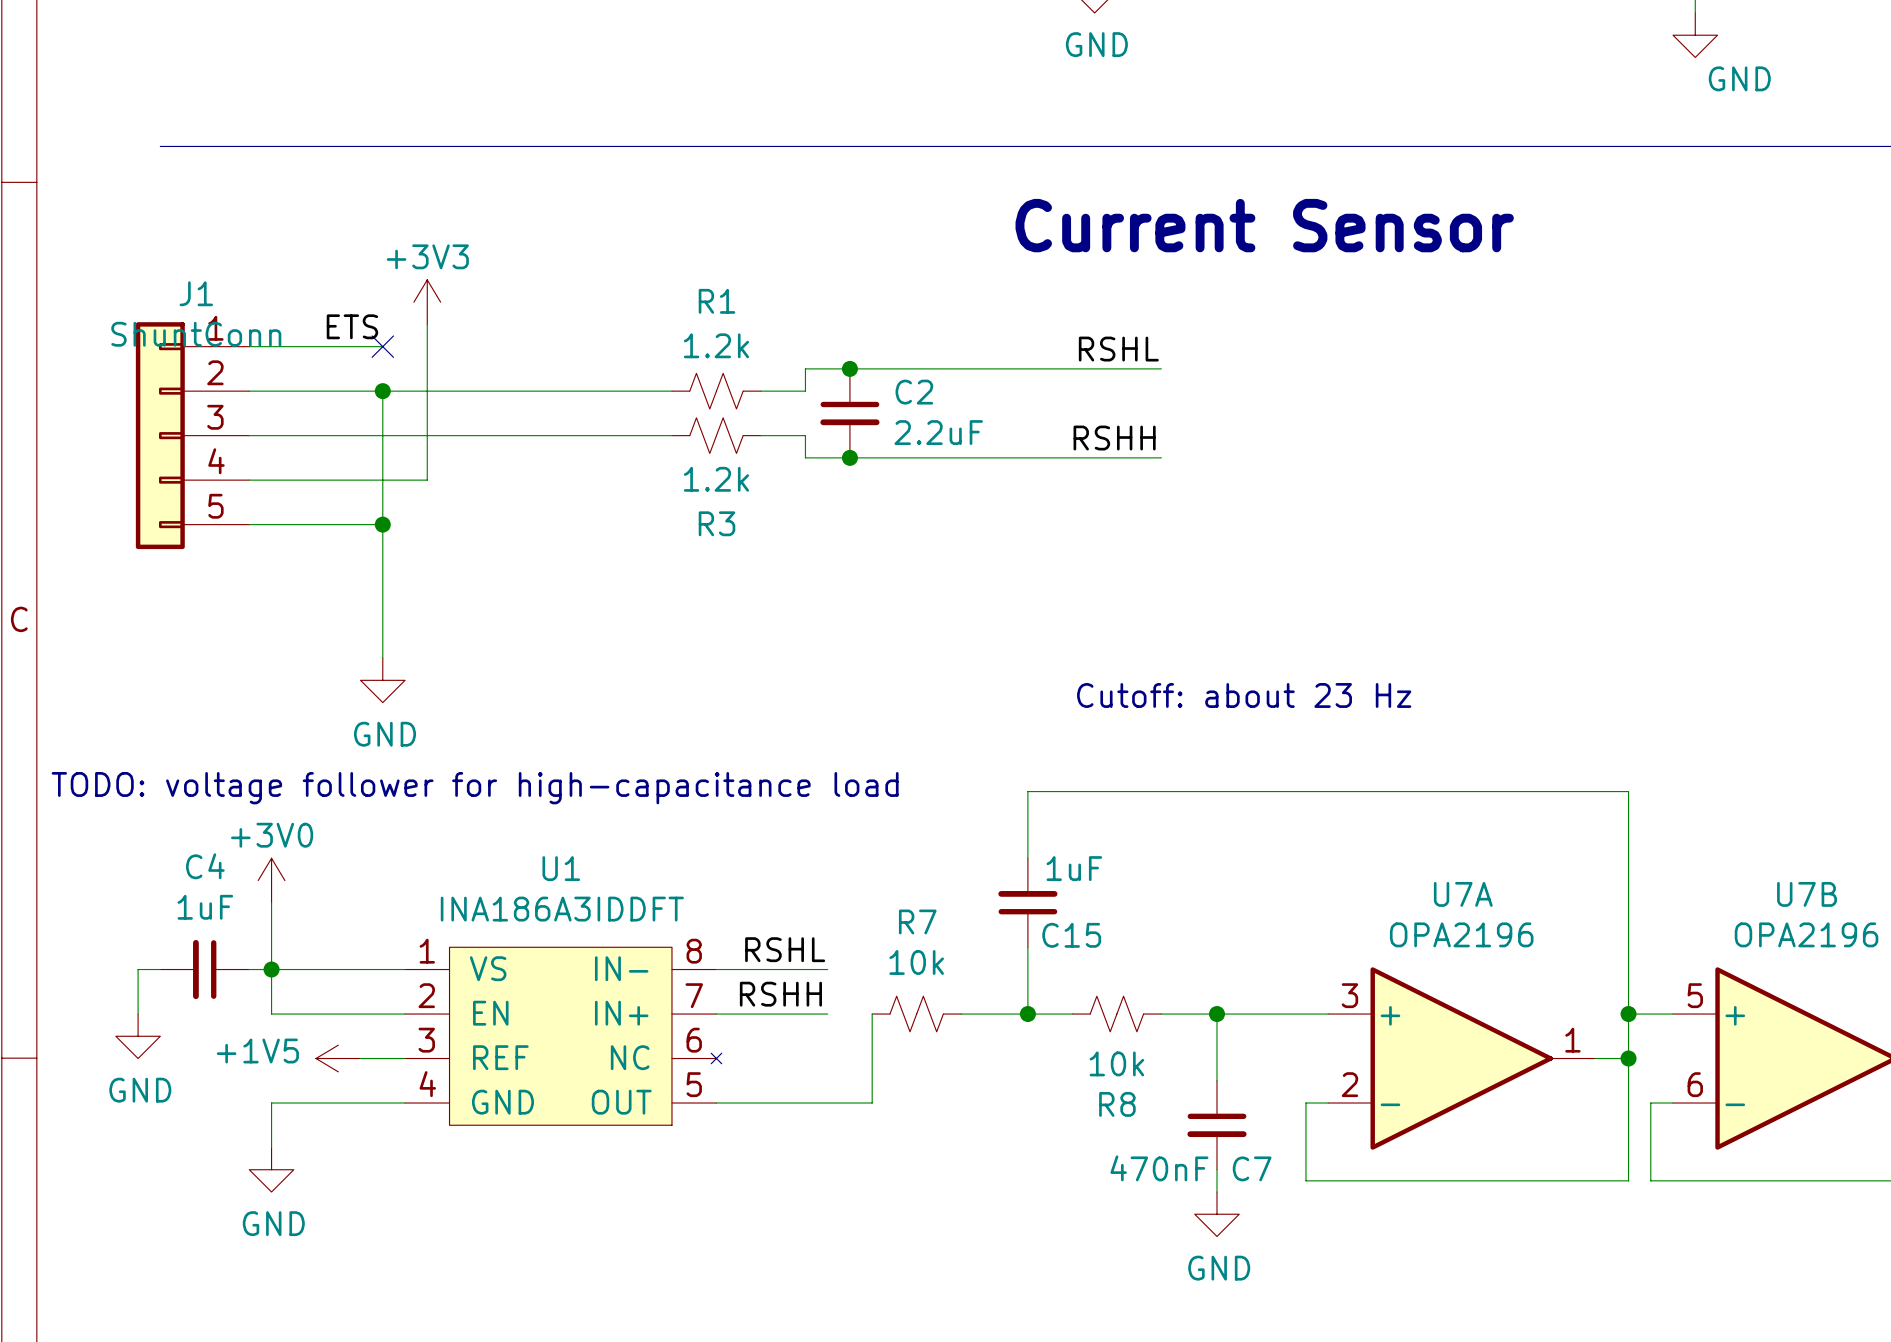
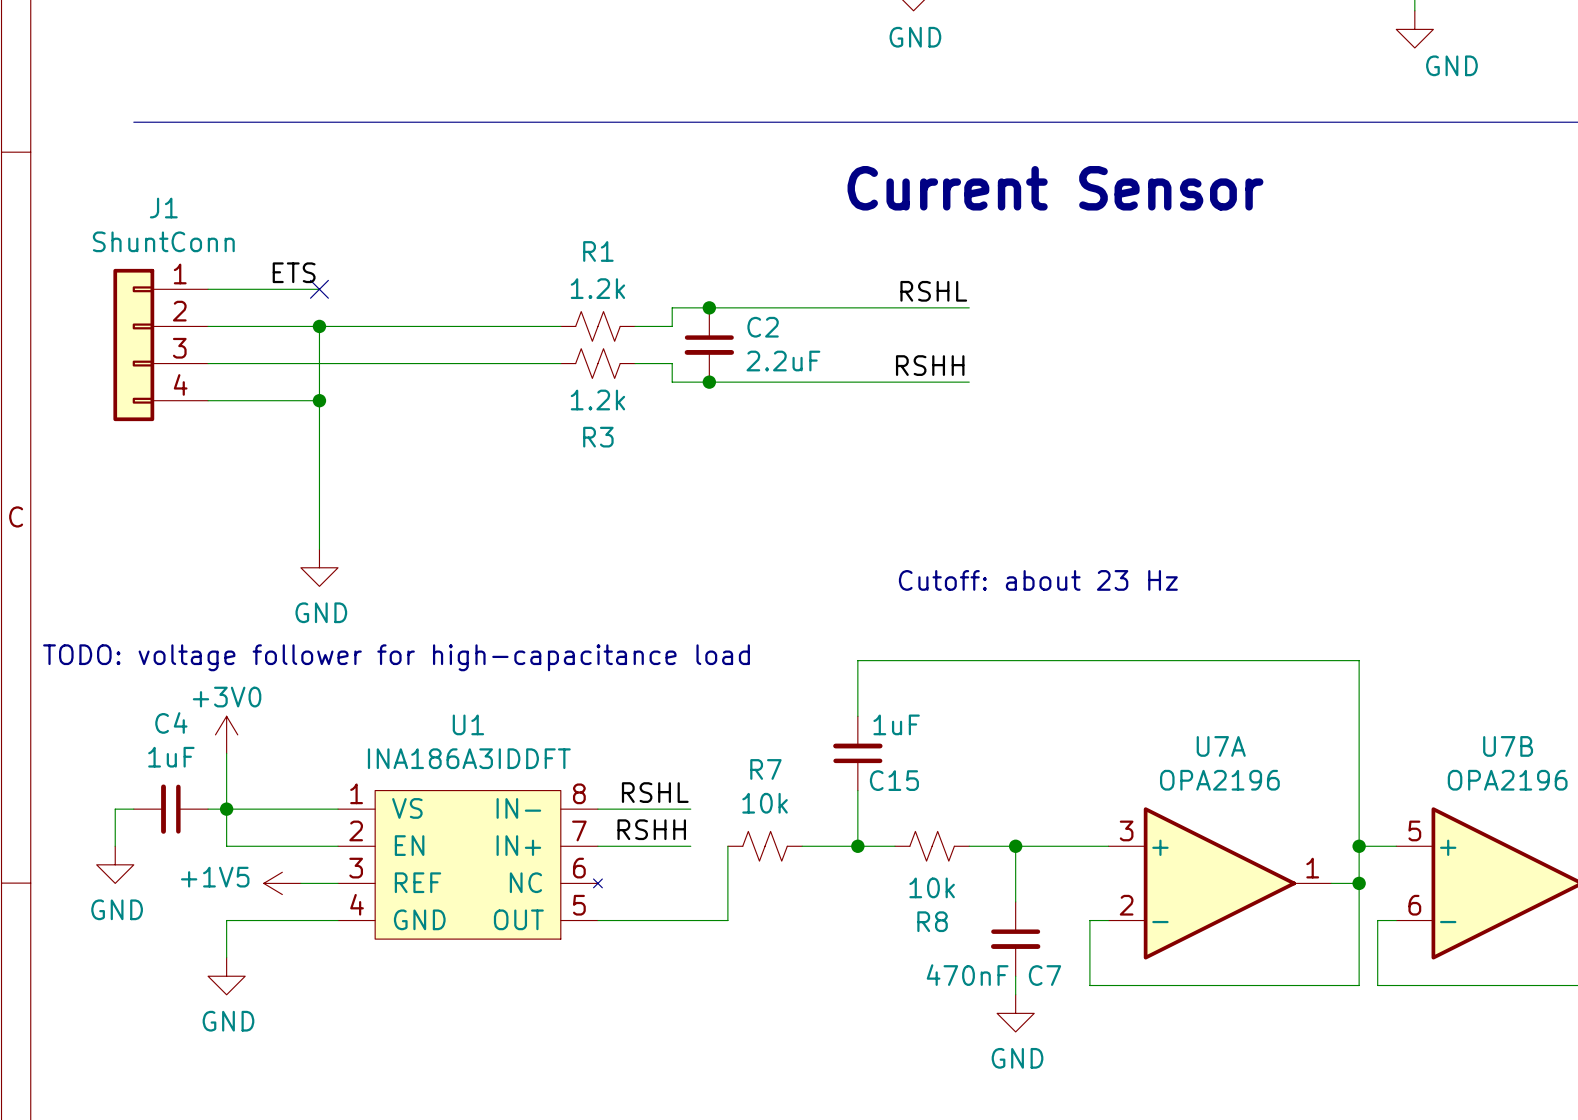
power symbol: +3V3 (427, 302) -> none
J1 symbol: [135, 322, 250, 550] -> [113, 268, 209, 422]
wire: (427, 324) (427, 480) (382, 480) -> none
wire: (249, 524) (382, 524) -> none
junction position: (382, 524) -> (319, 400)

